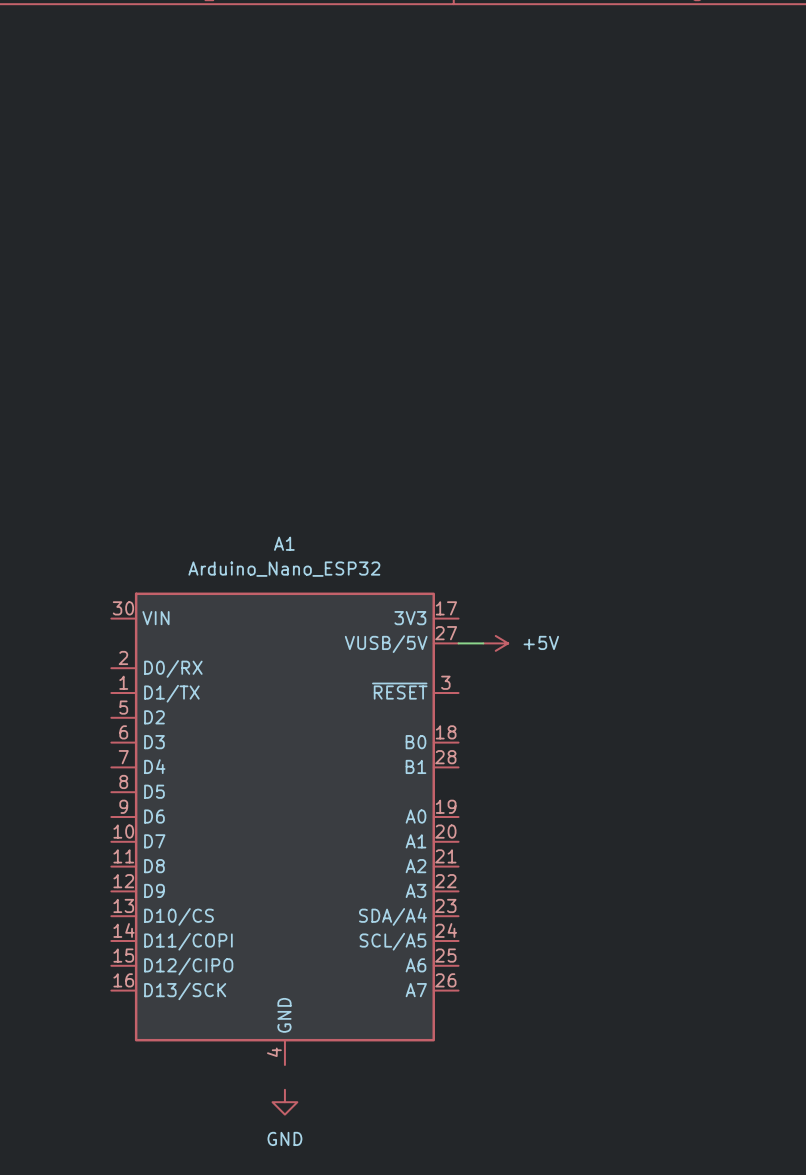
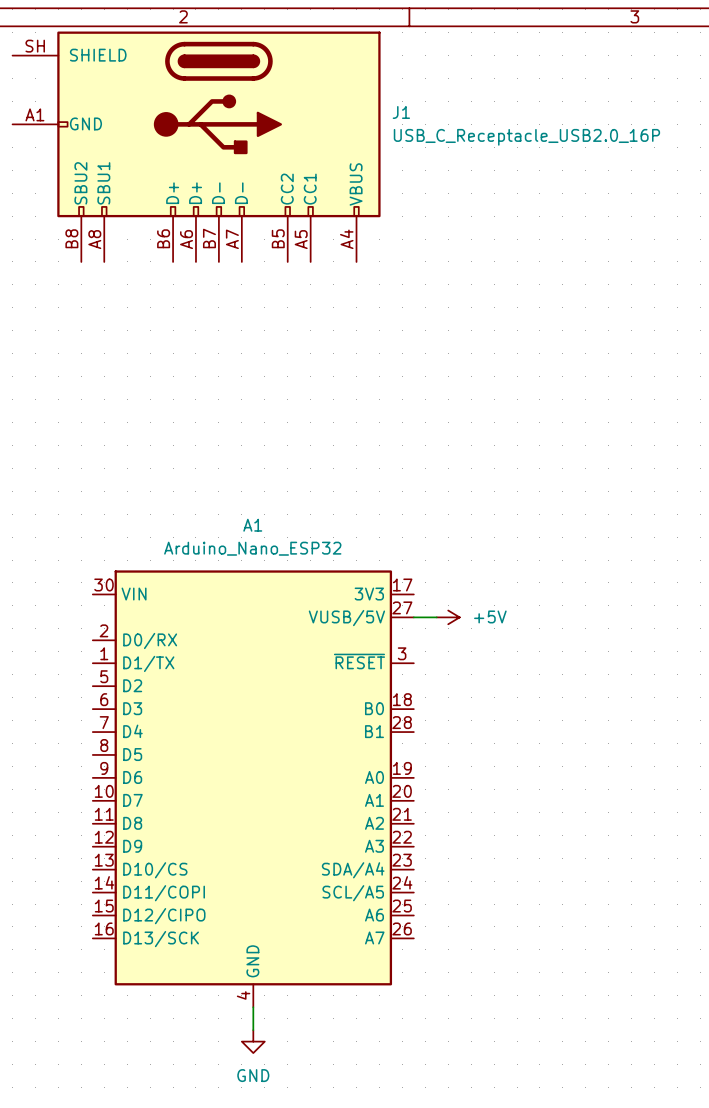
J1: none -> USB_C_Receptacle_USB2.0_16P (196, 146)
wire: none -> (253, 1007) (253, 1030)

